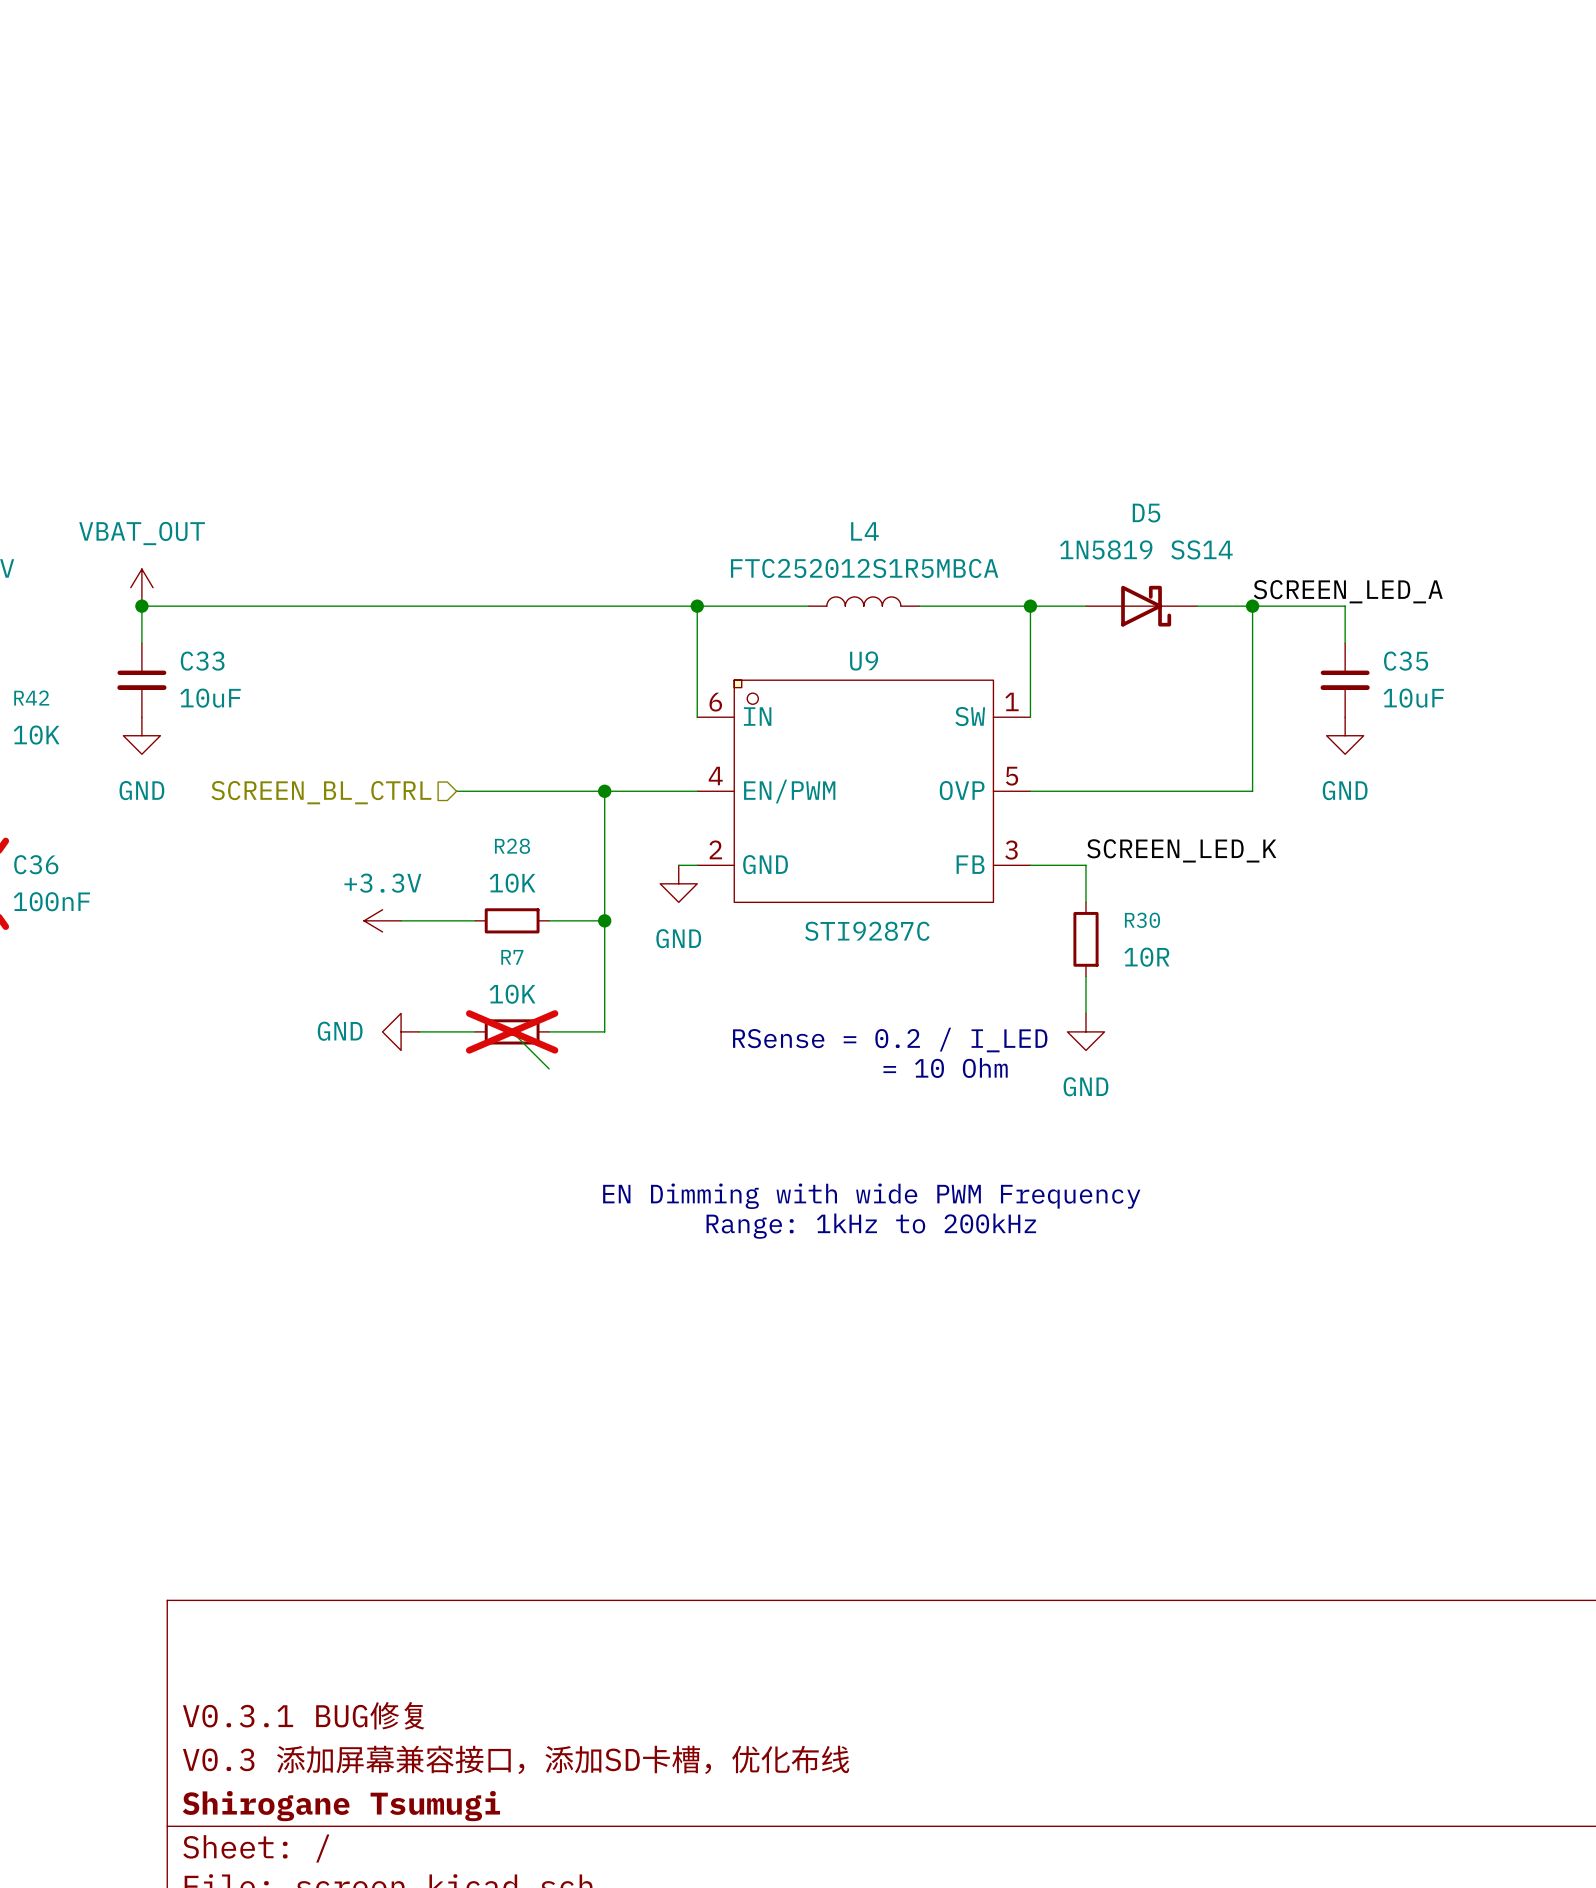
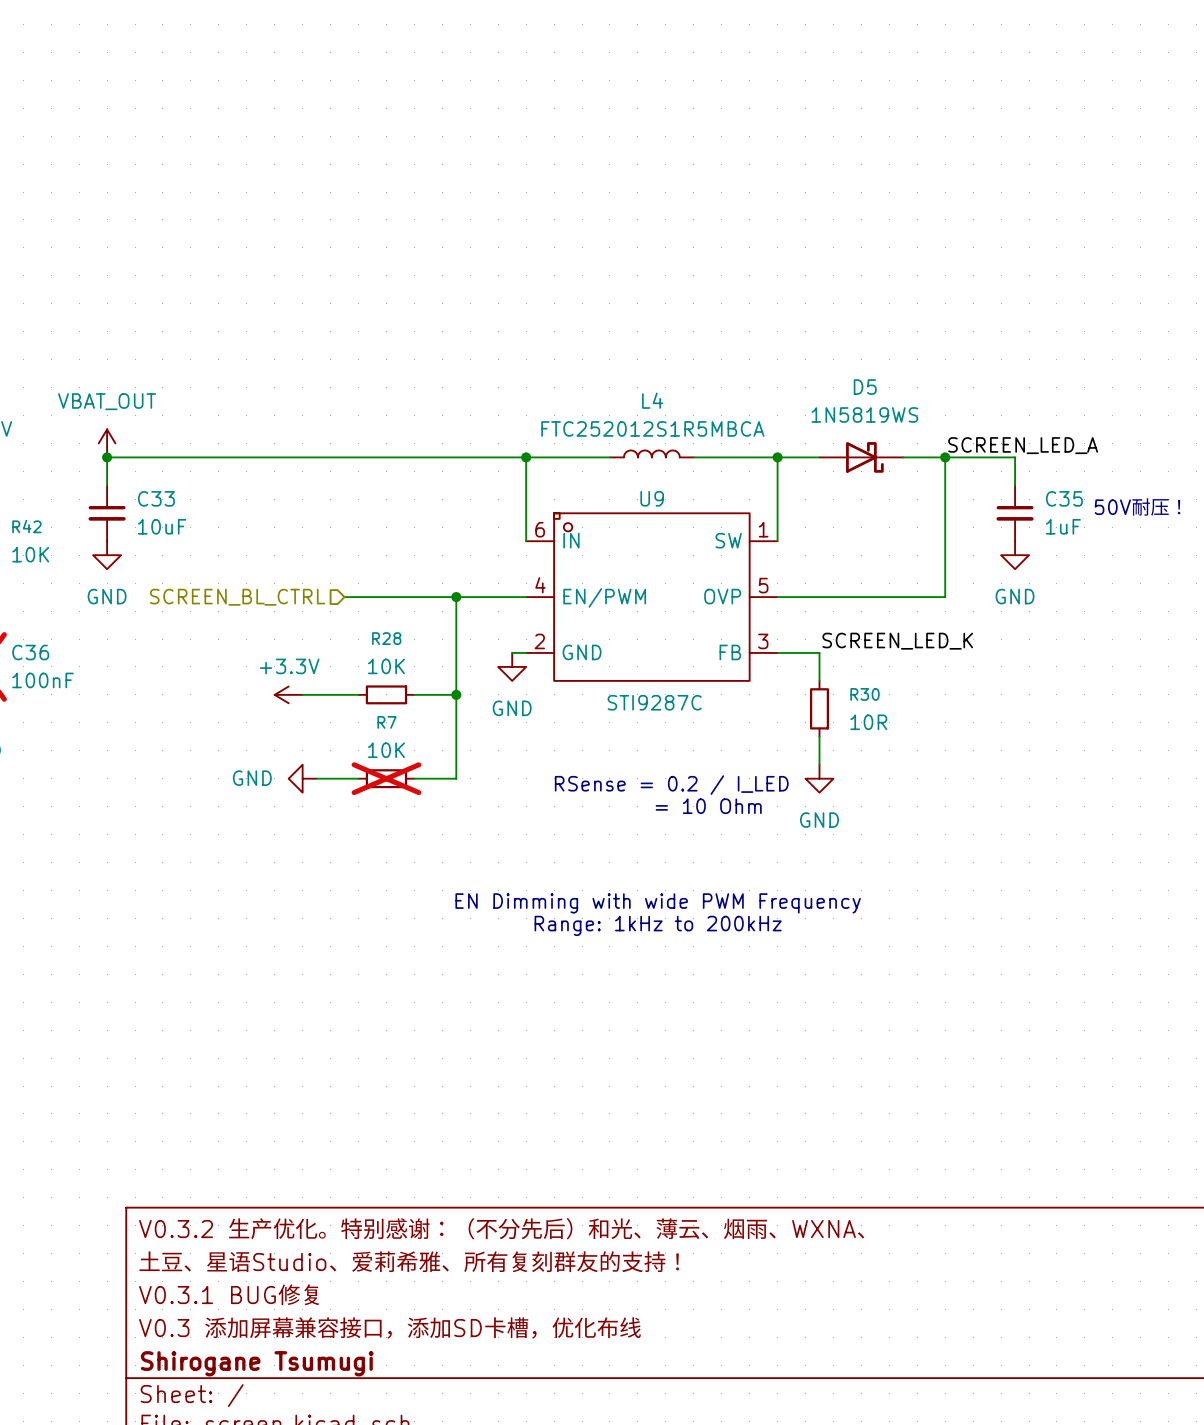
D5 value: 1N5819 SS14 (1146, 549) -> 1N5819WS (864, 414)
text: none -> 50V耐压！ (1137, 507)
C35 value: 10uF (1413, 698) -> 1uF (1063, 526)
wire: (512, 1031) (549, 1068) -> none
title block: none -> V0.3.2 生产优化。特别感谢：（不分先后）和光、薄云、烟雨、WXNA、 (502, 1228)
title block: none -> 土豆、星语Studio、爱莉希雅、所有复刻群友的支持！ (409, 1261)

